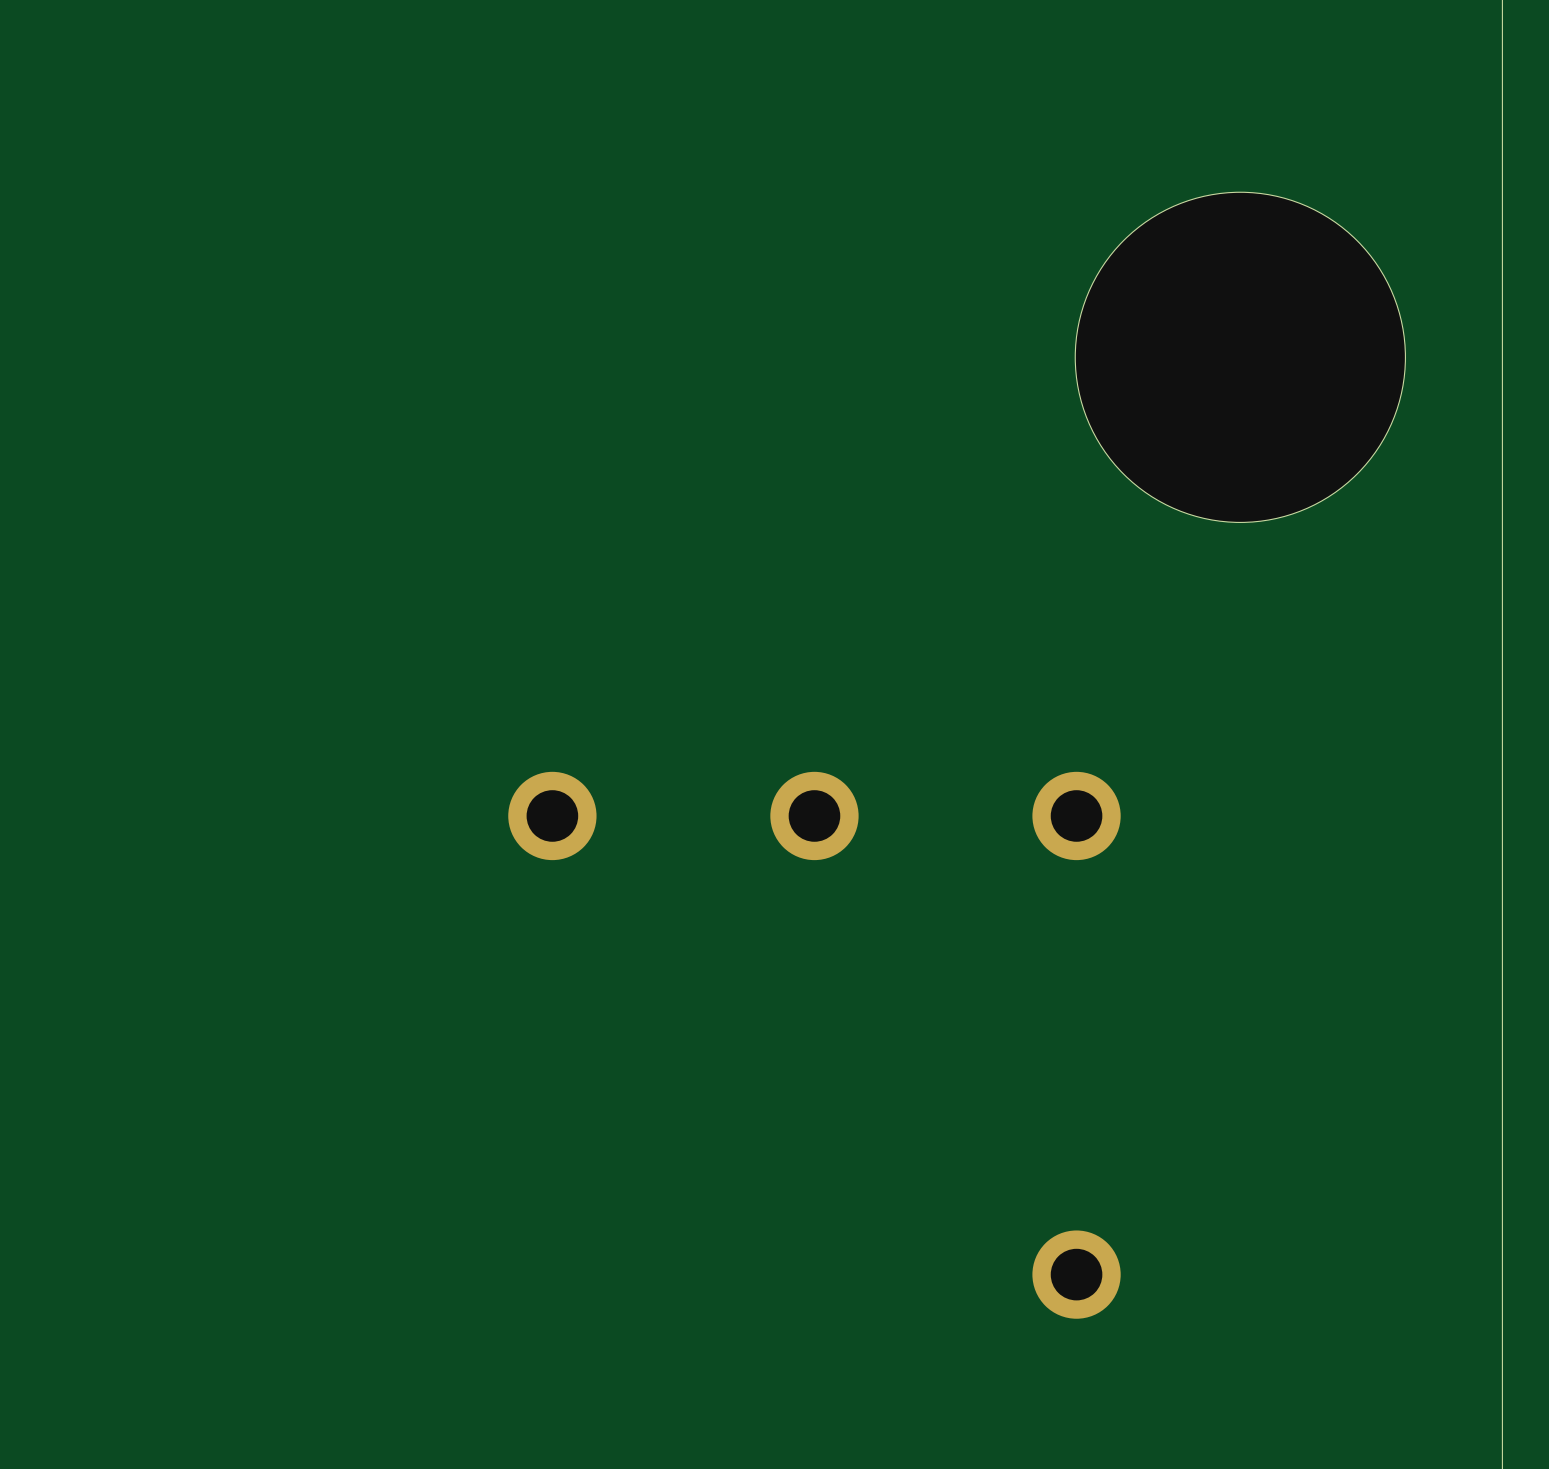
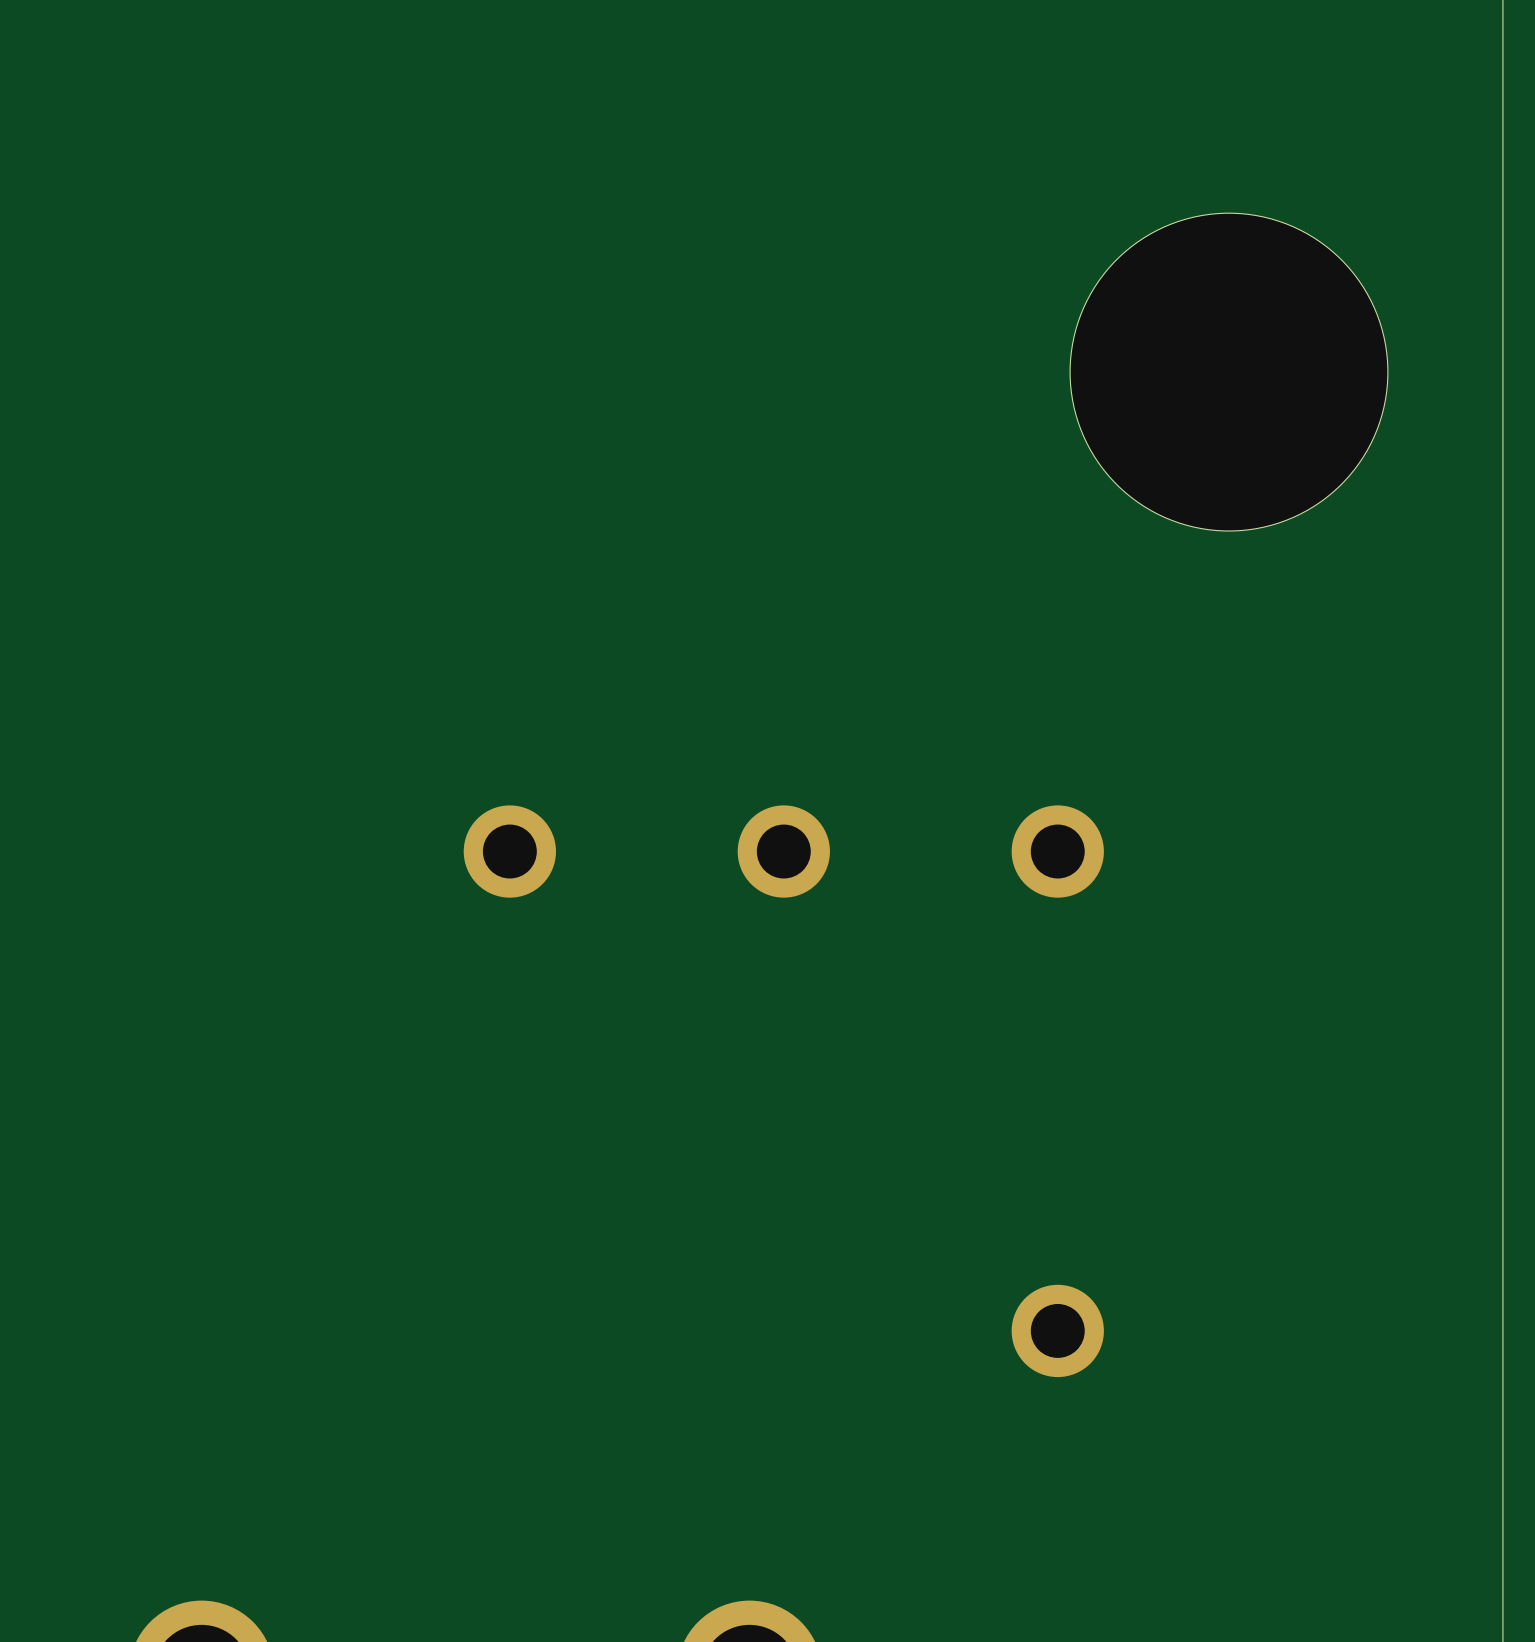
hole size: [1075, 192, 1406, 523] -> [1070, 213, 1388, 531]

